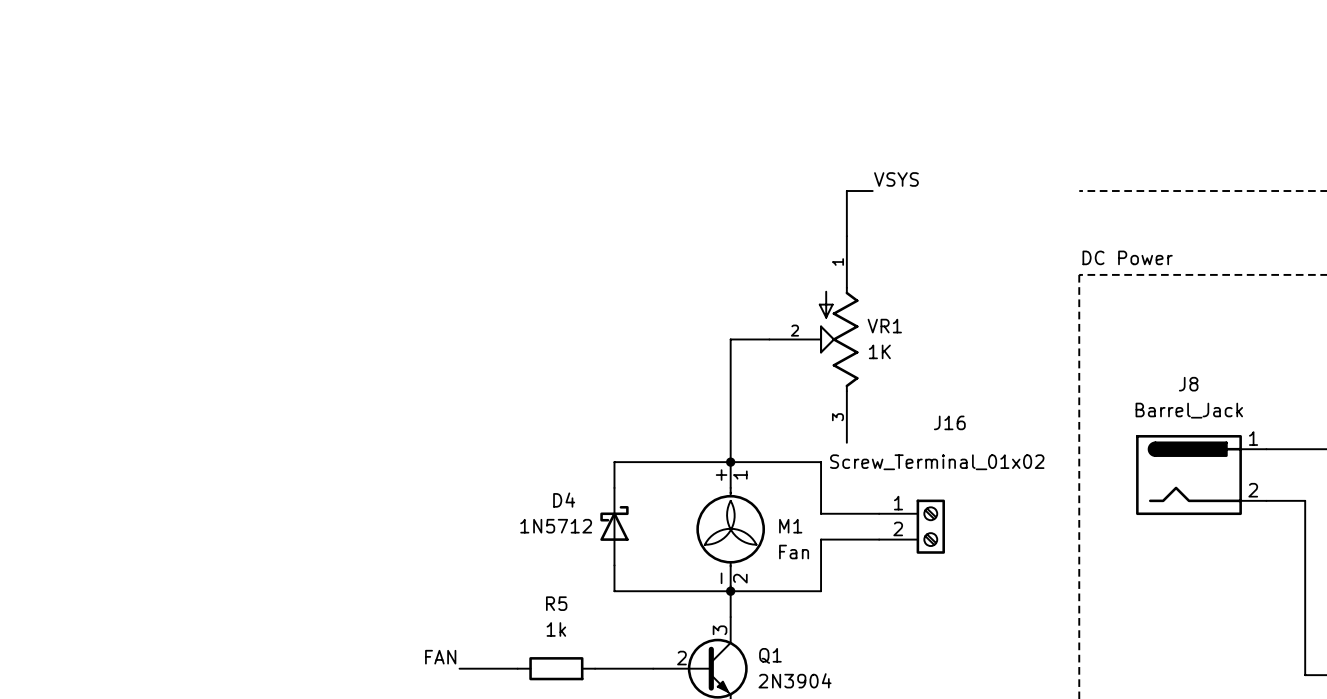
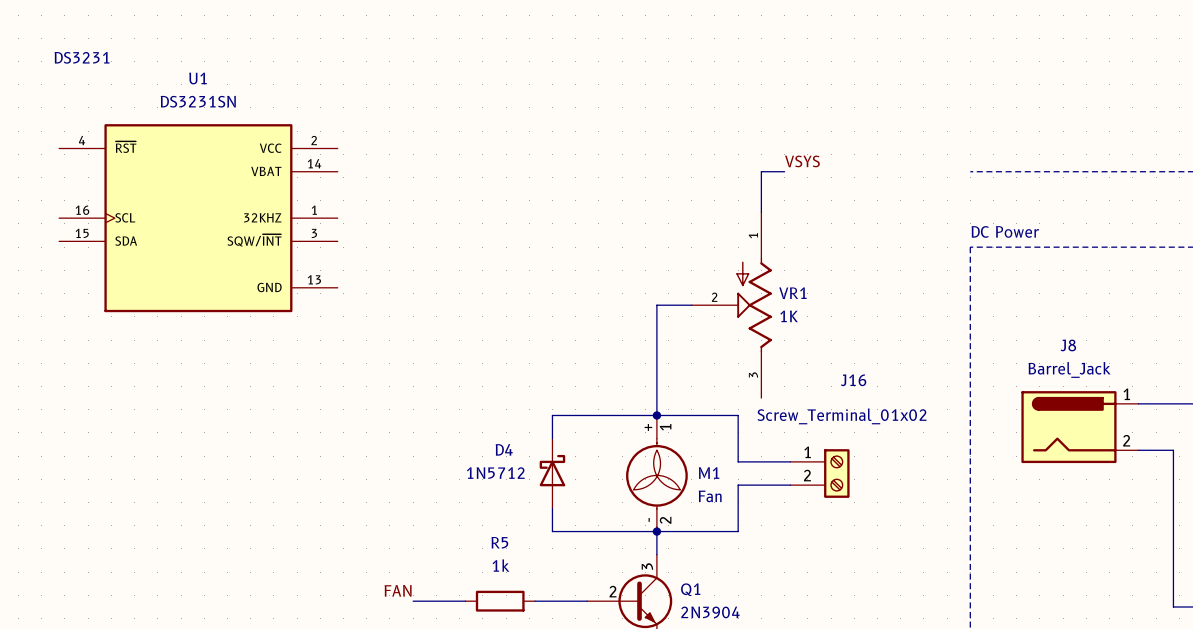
text: none -> DS3231 (82, 57)
U1: none -> DS3231SN (198, 218)

